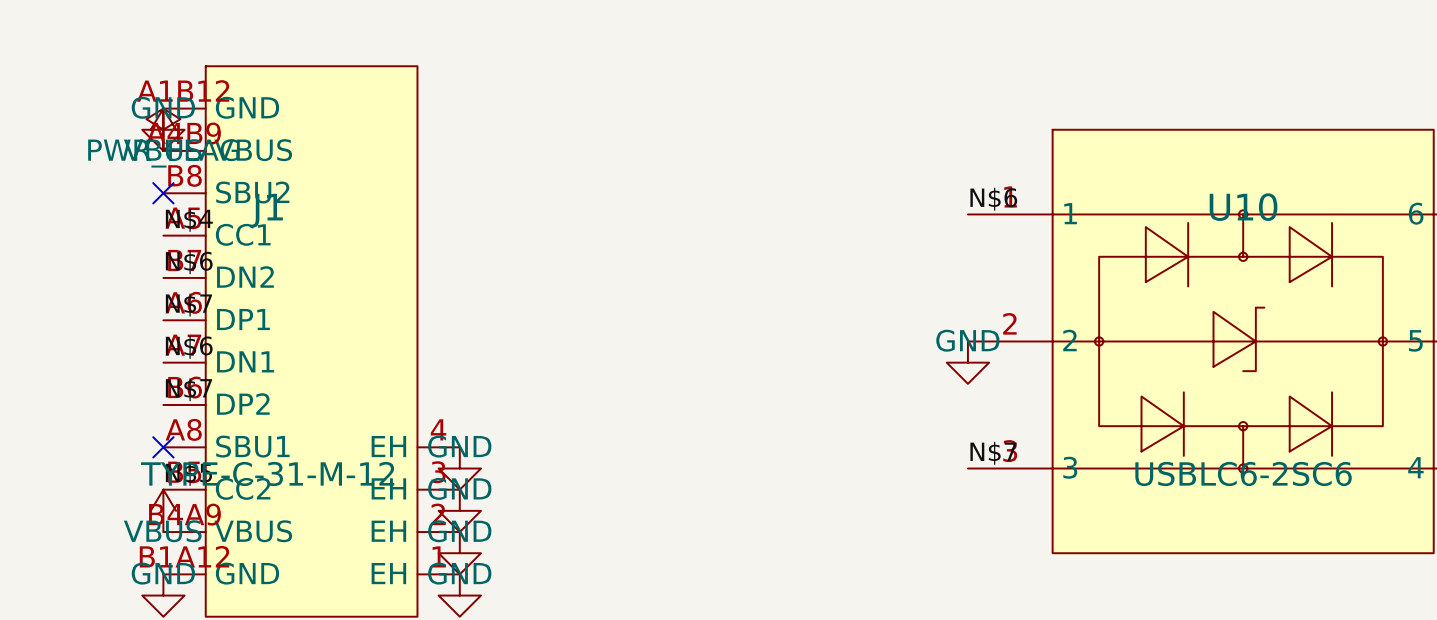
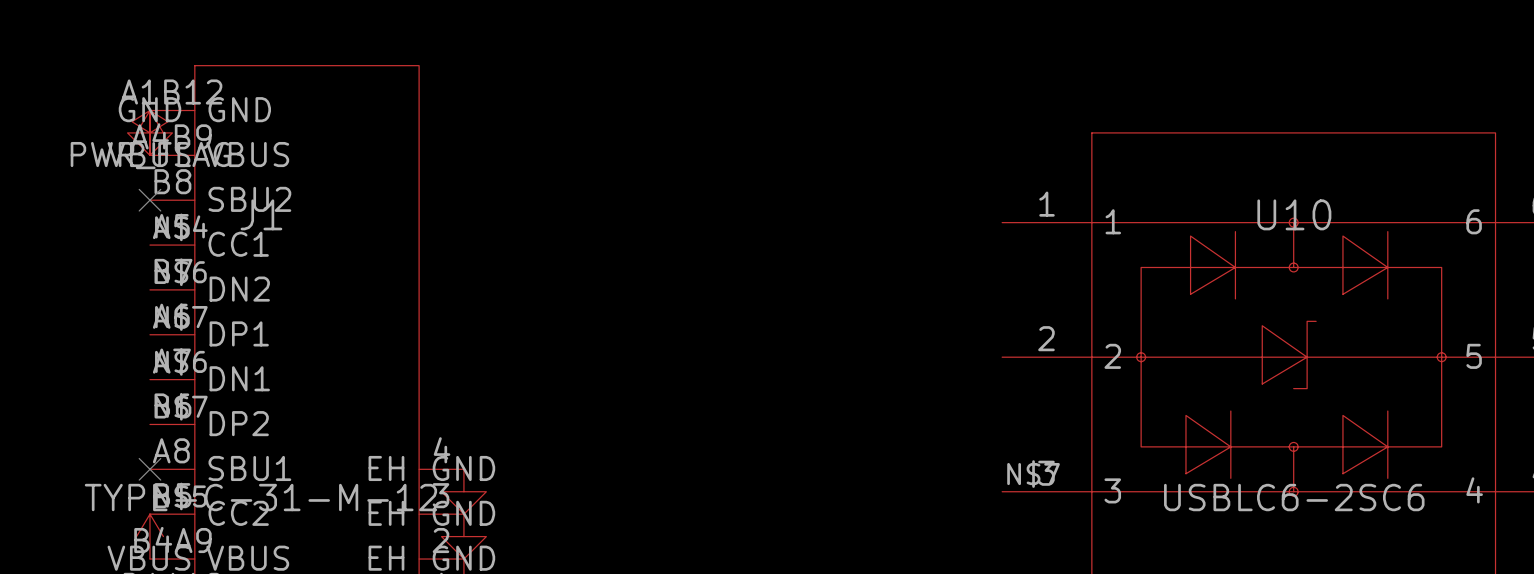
label: N$6 (993, 199) -> none
power symbol: GND (967, 362) -> none

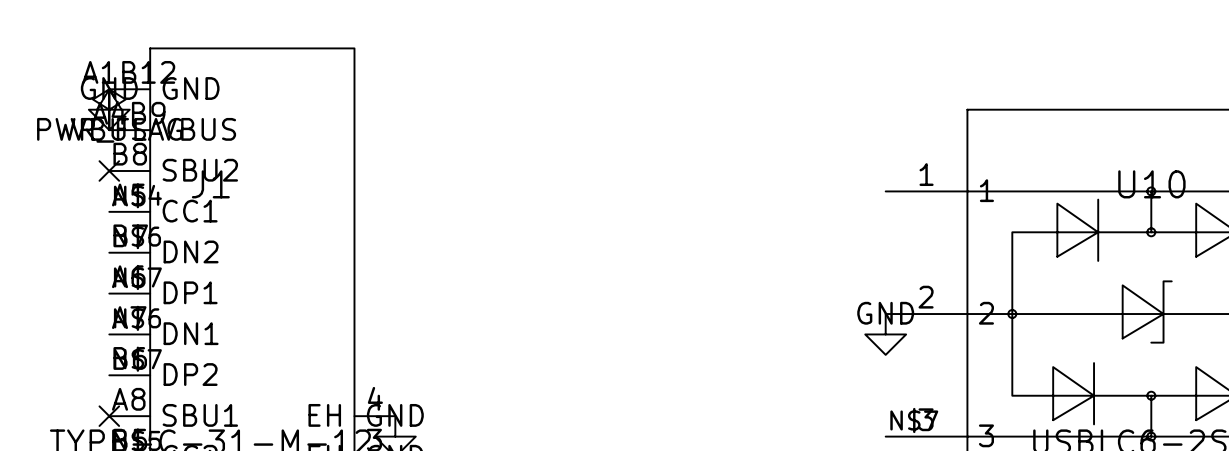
power symbol: none -> GND (885, 334)

